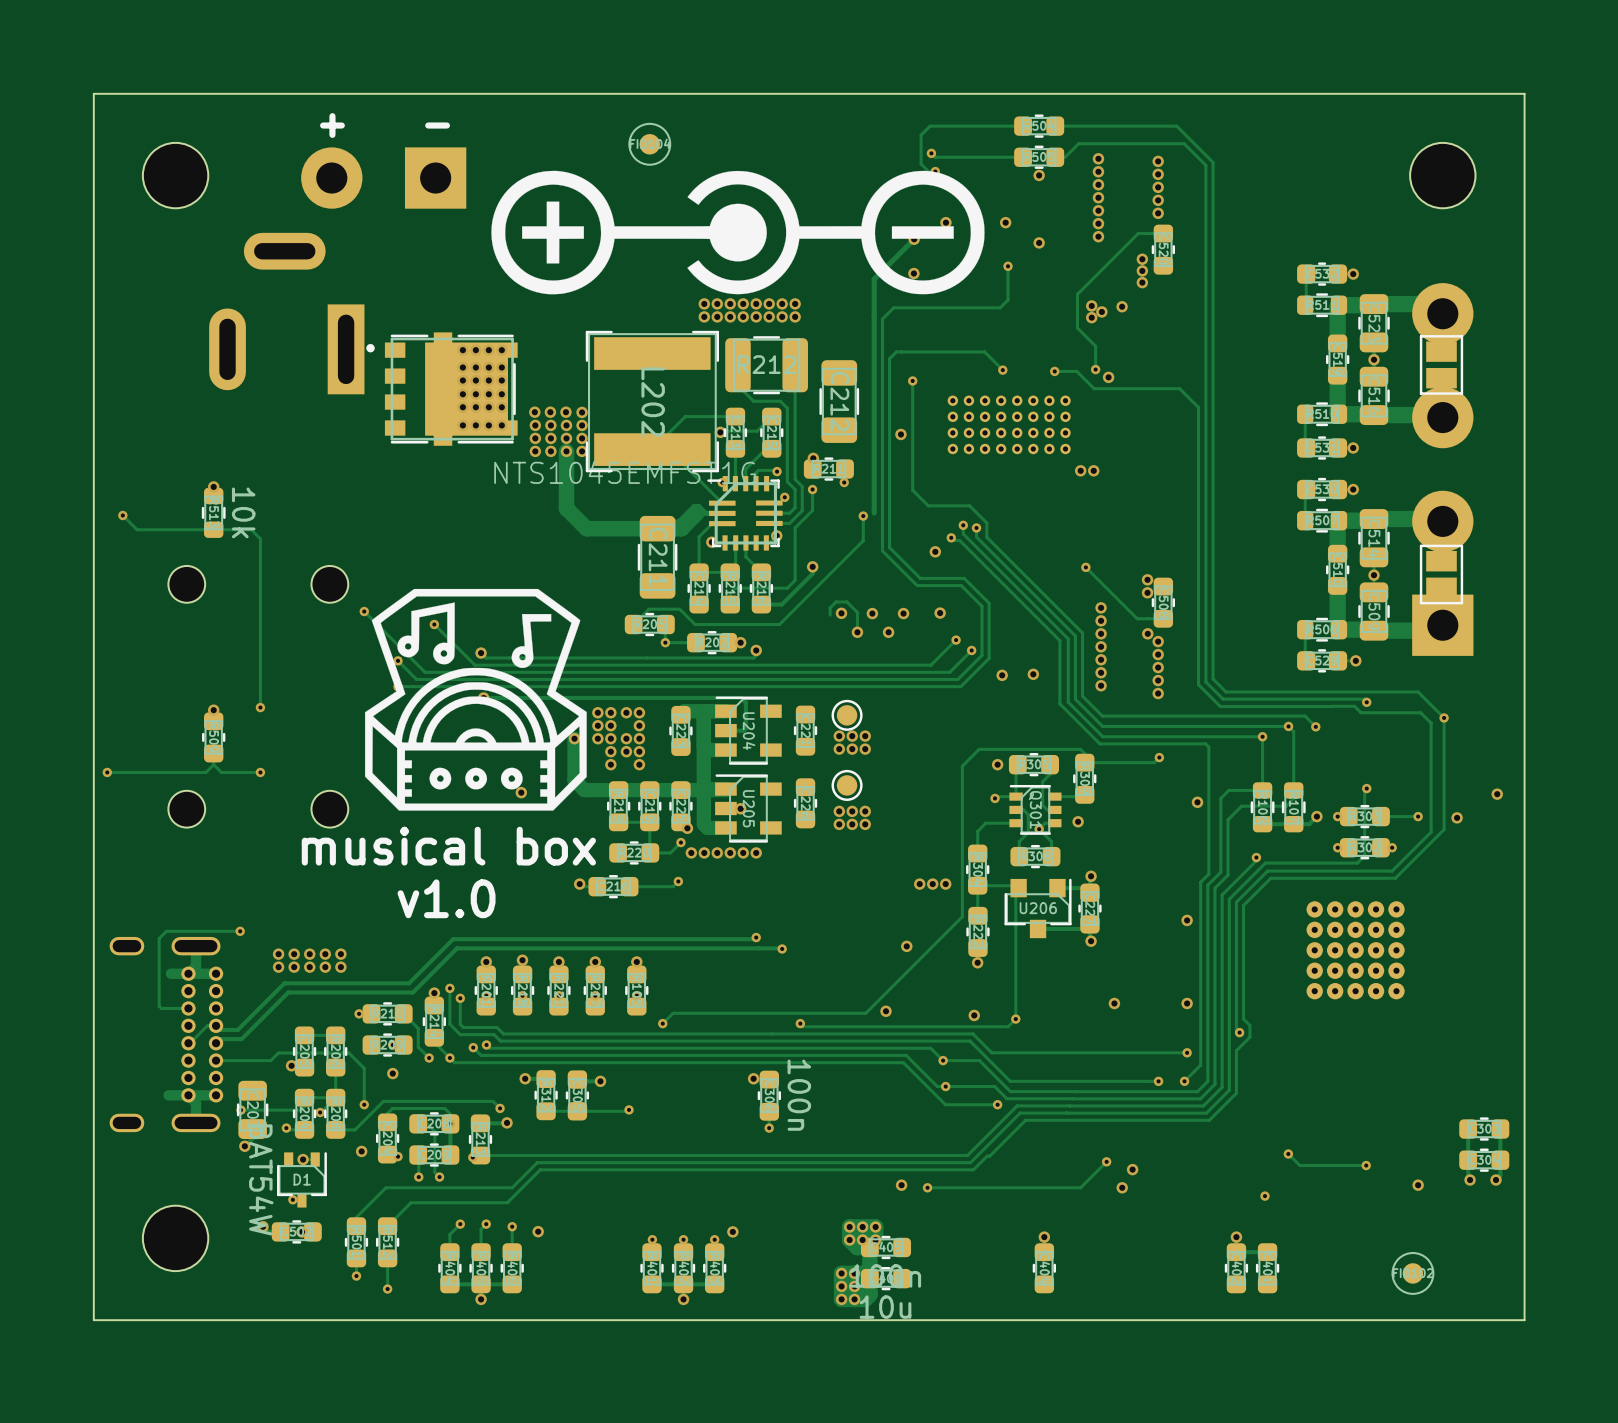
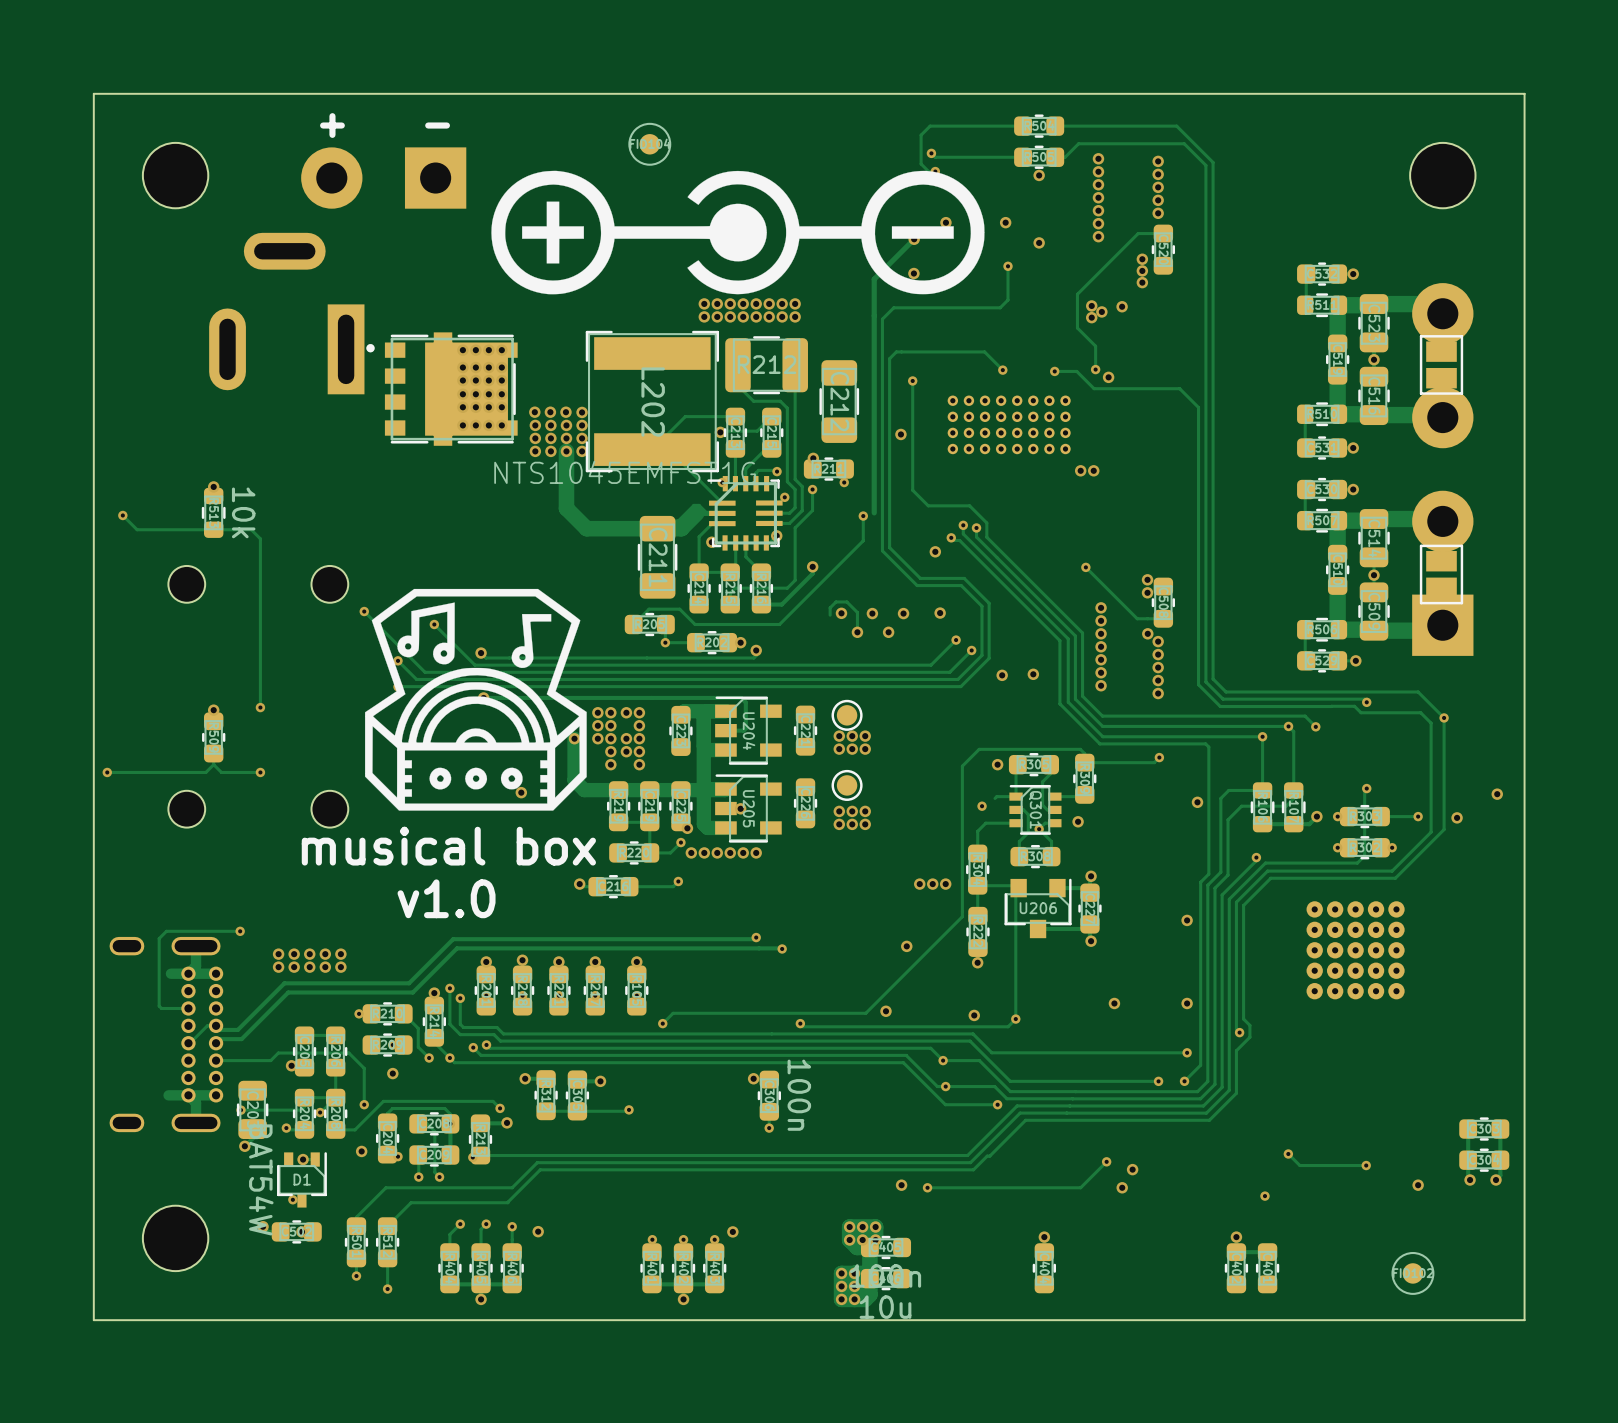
via position: (995, 798) -> (982, 806)

